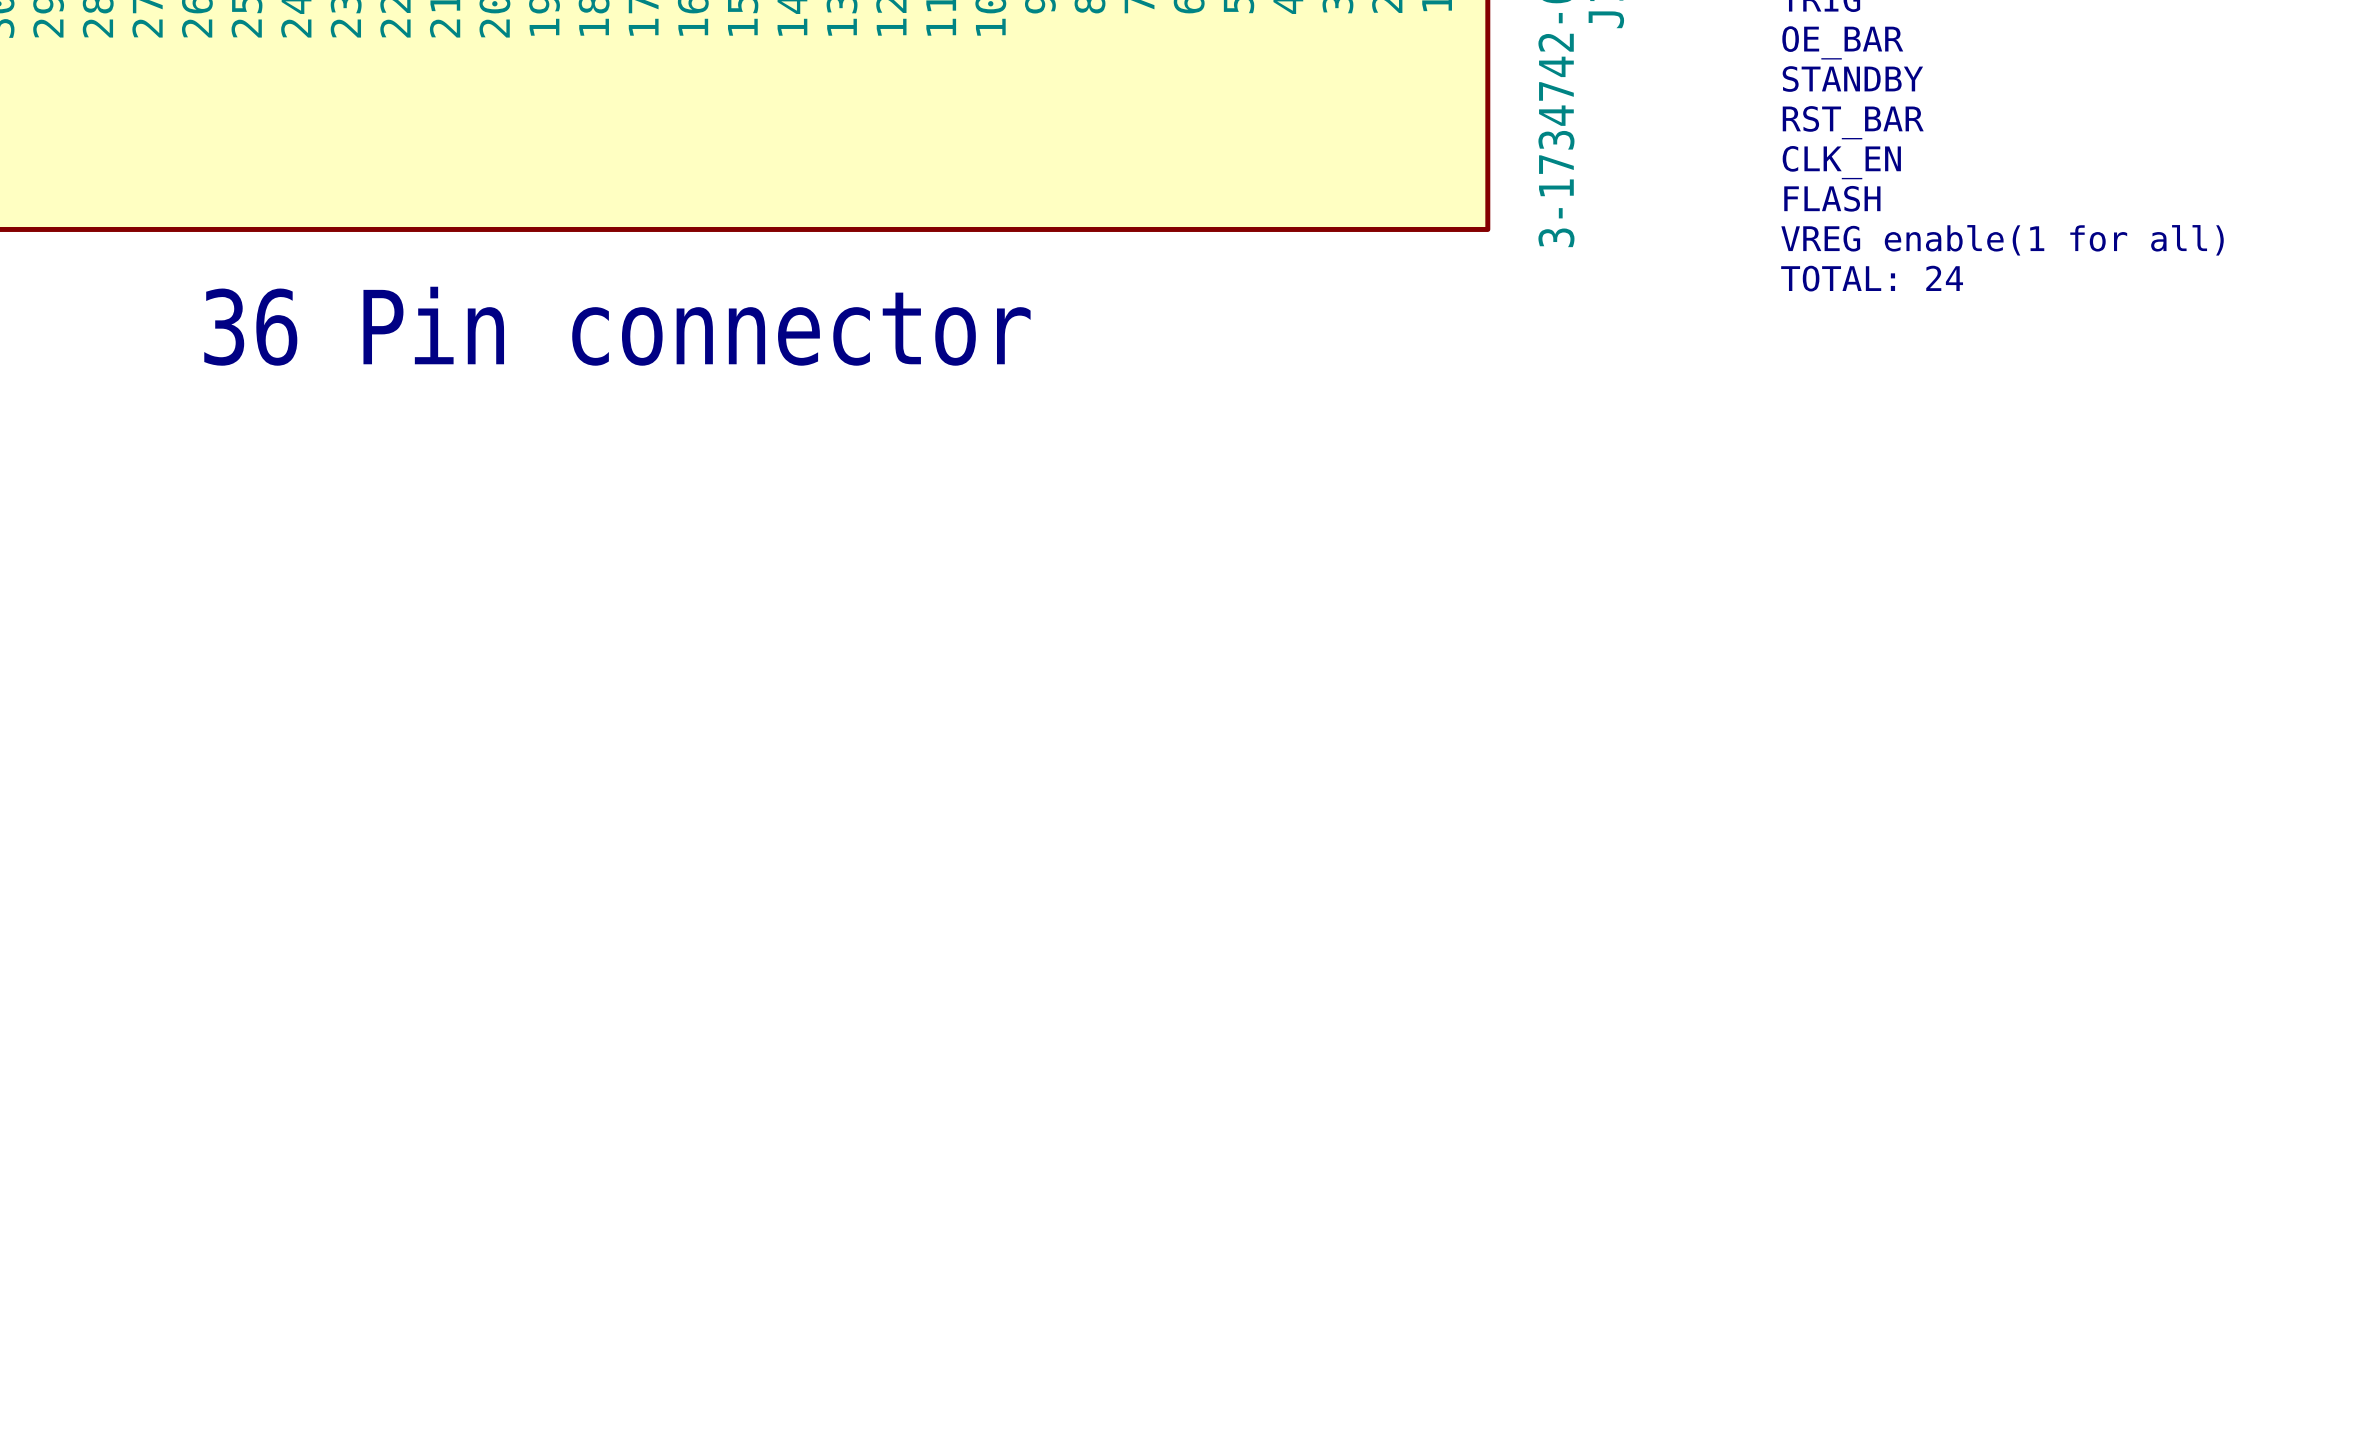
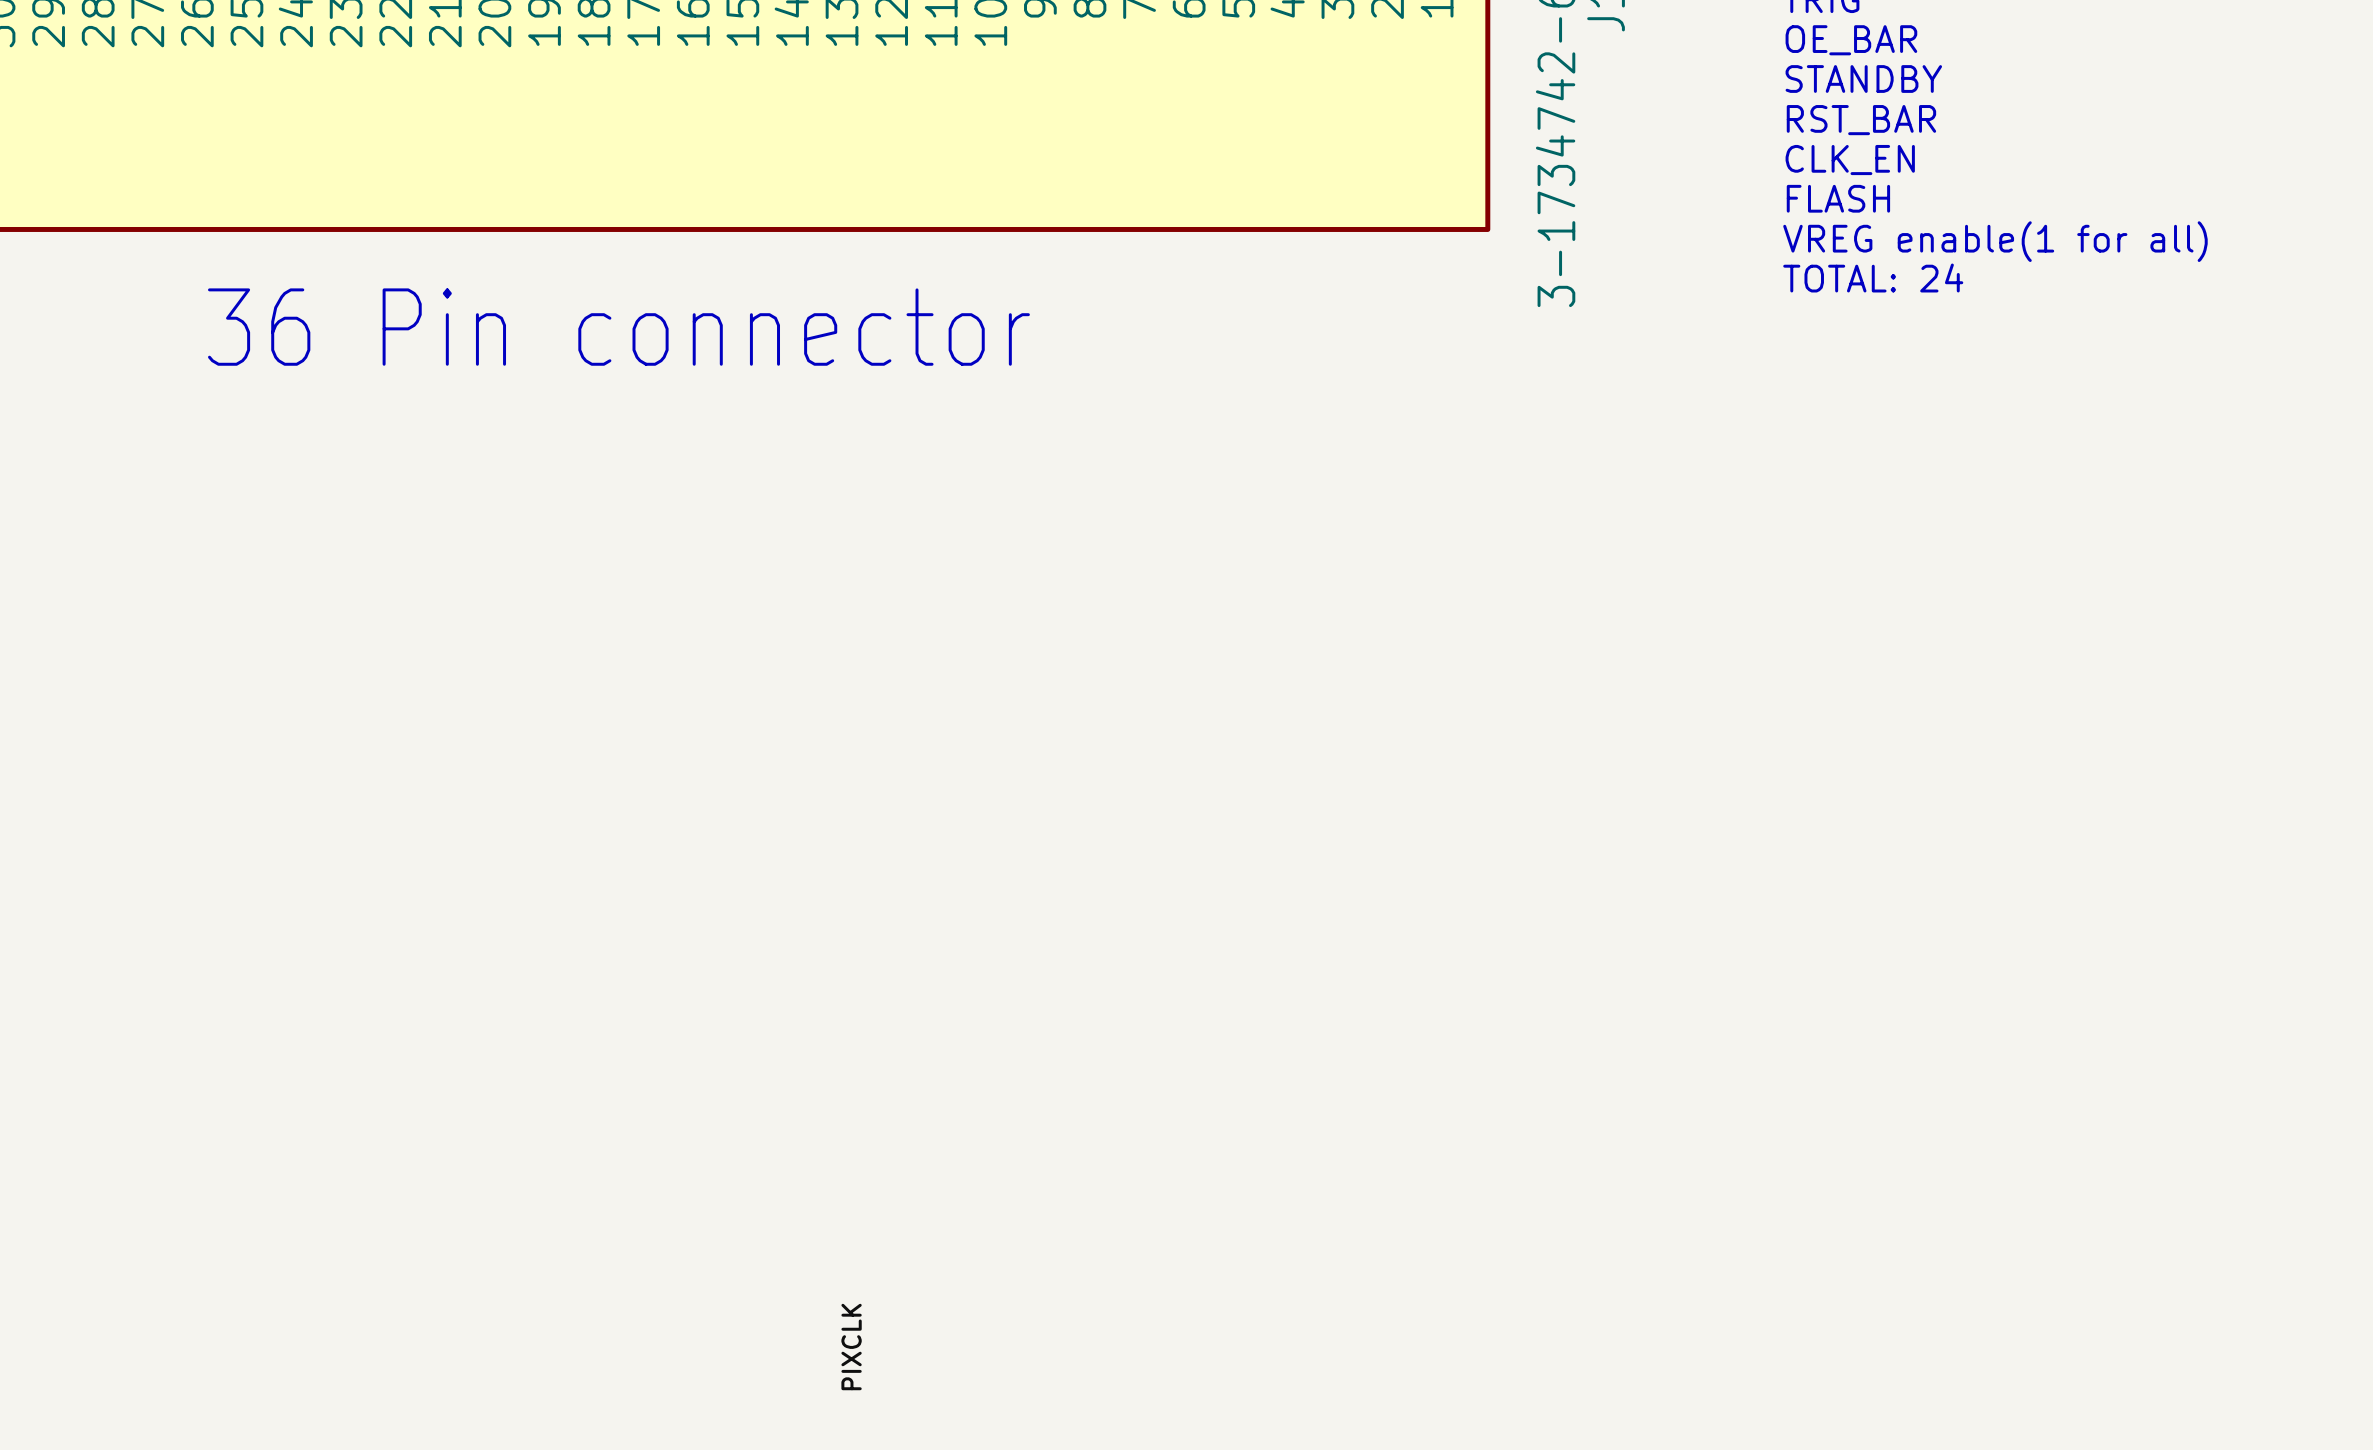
label: none -> PIXCLK (851, 1347)

